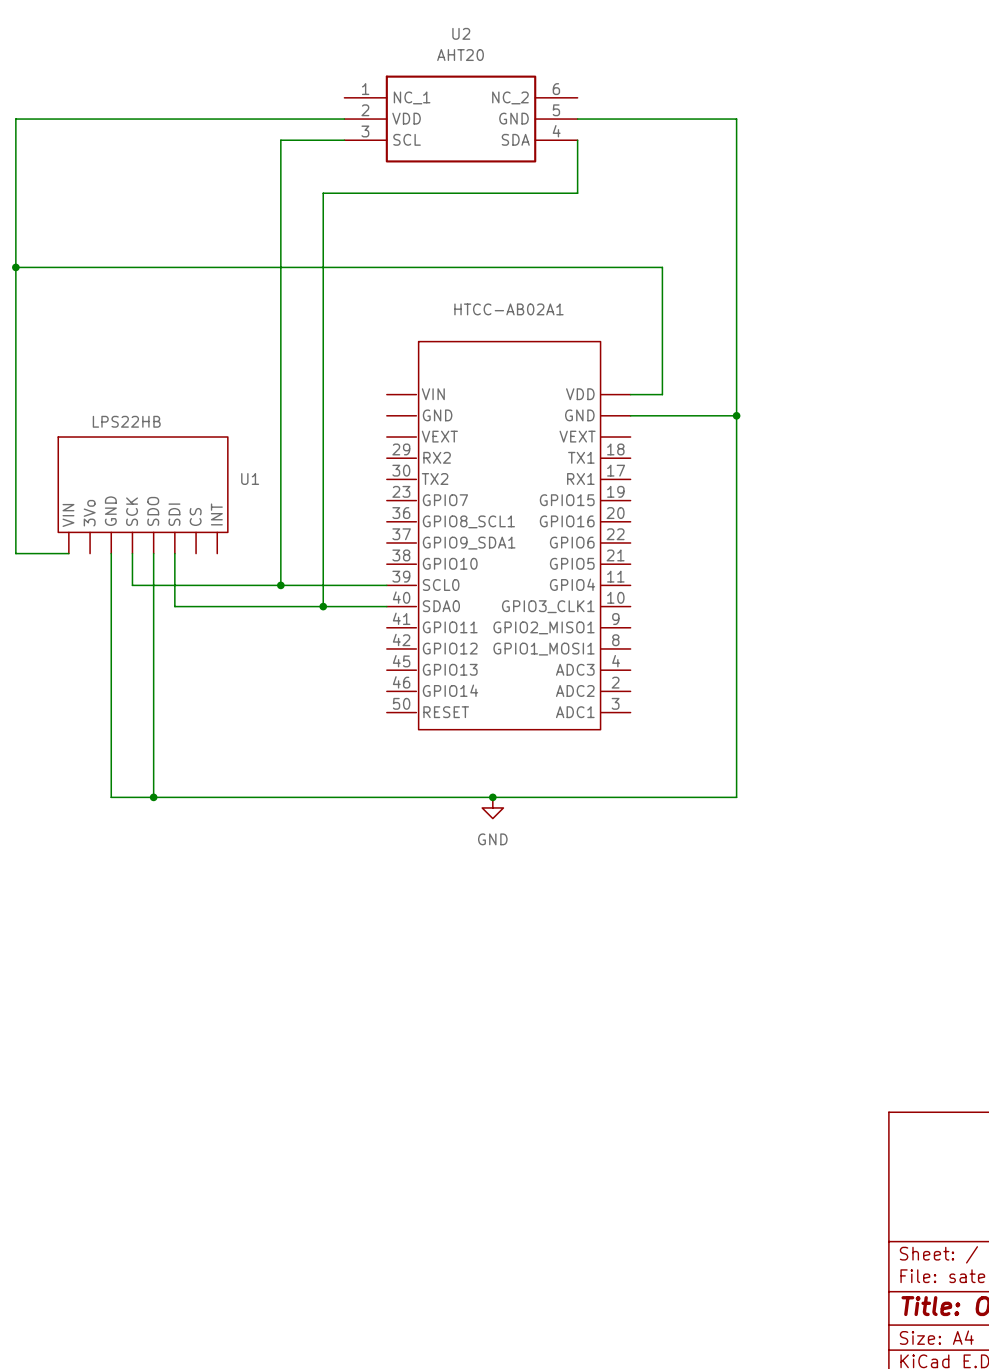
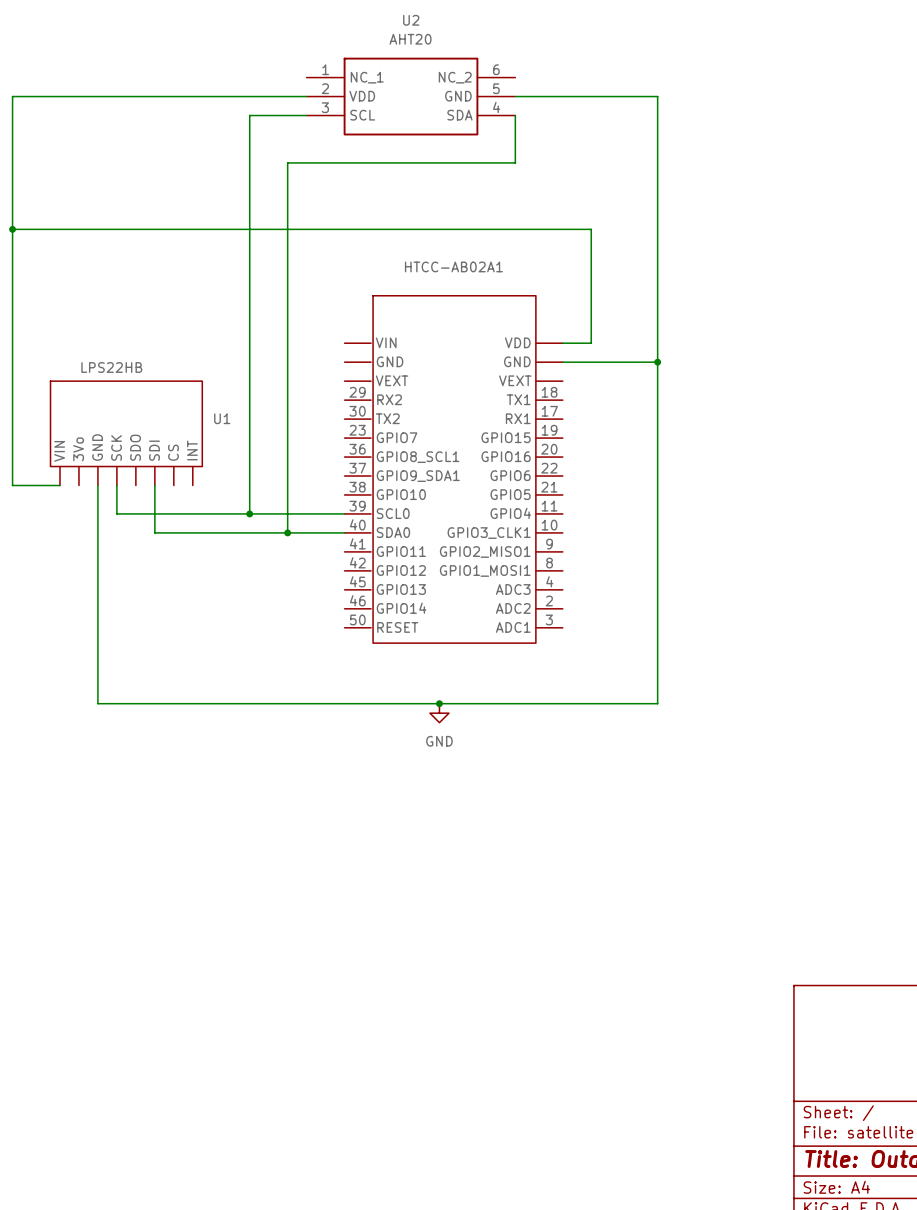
wire: (153, 553) (153, 797) -> none
junction: (153, 797) -> none

